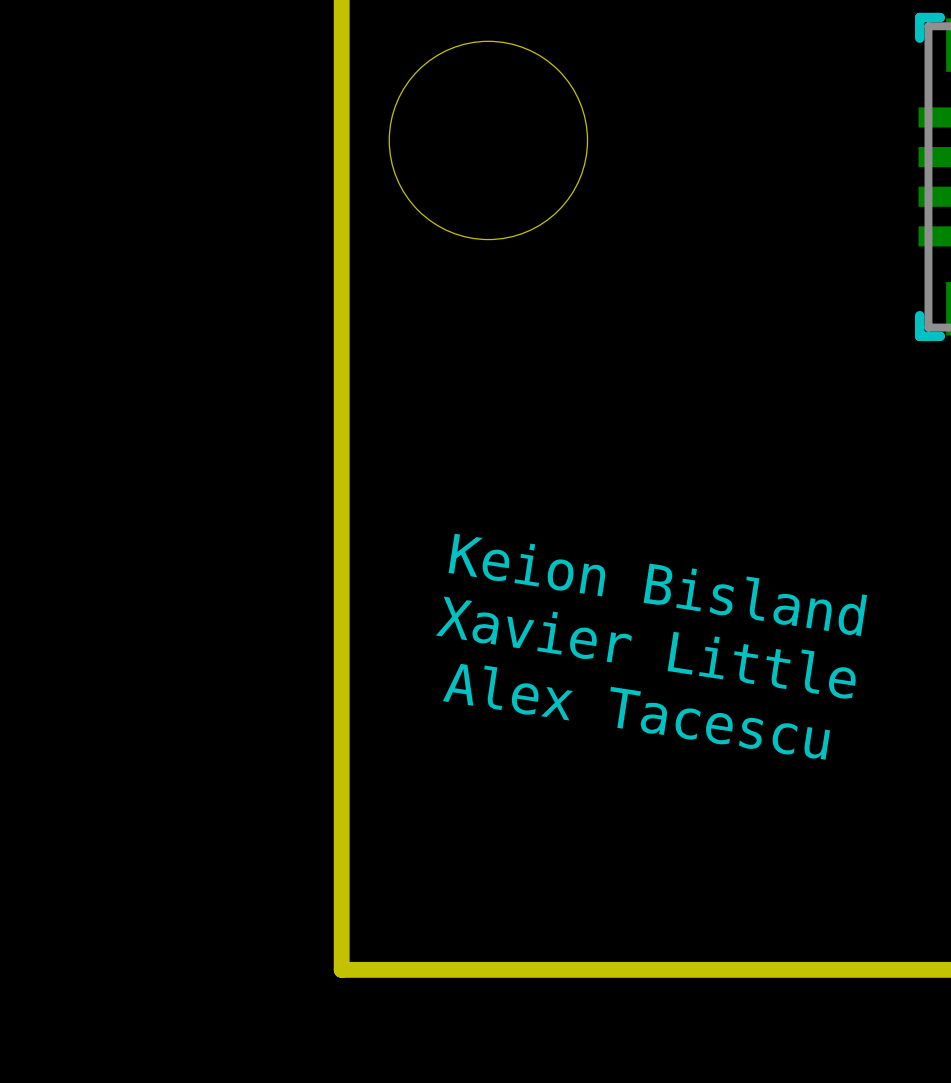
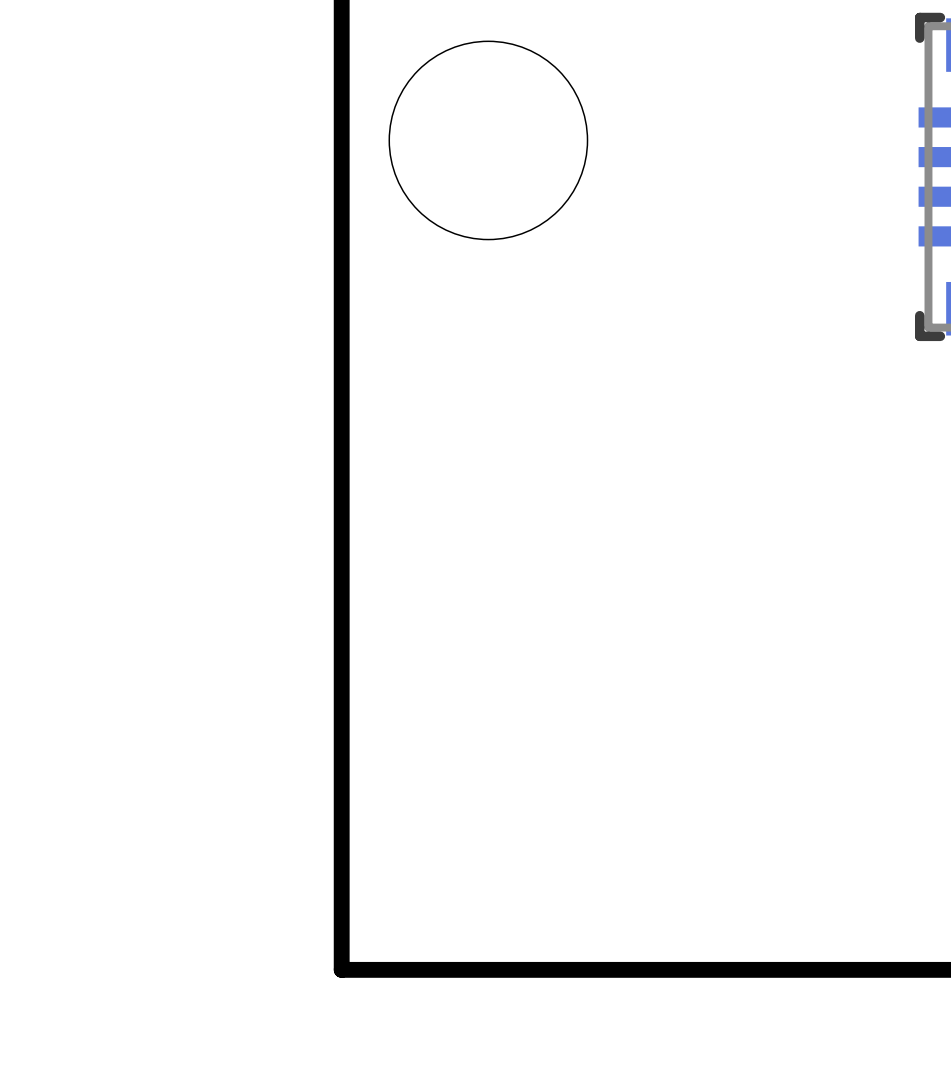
text: Keion Bisland (657, 584) -> none
text: Xavier Little (646, 647) -> none
text: Alex Tacescu (636, 711) -> none

